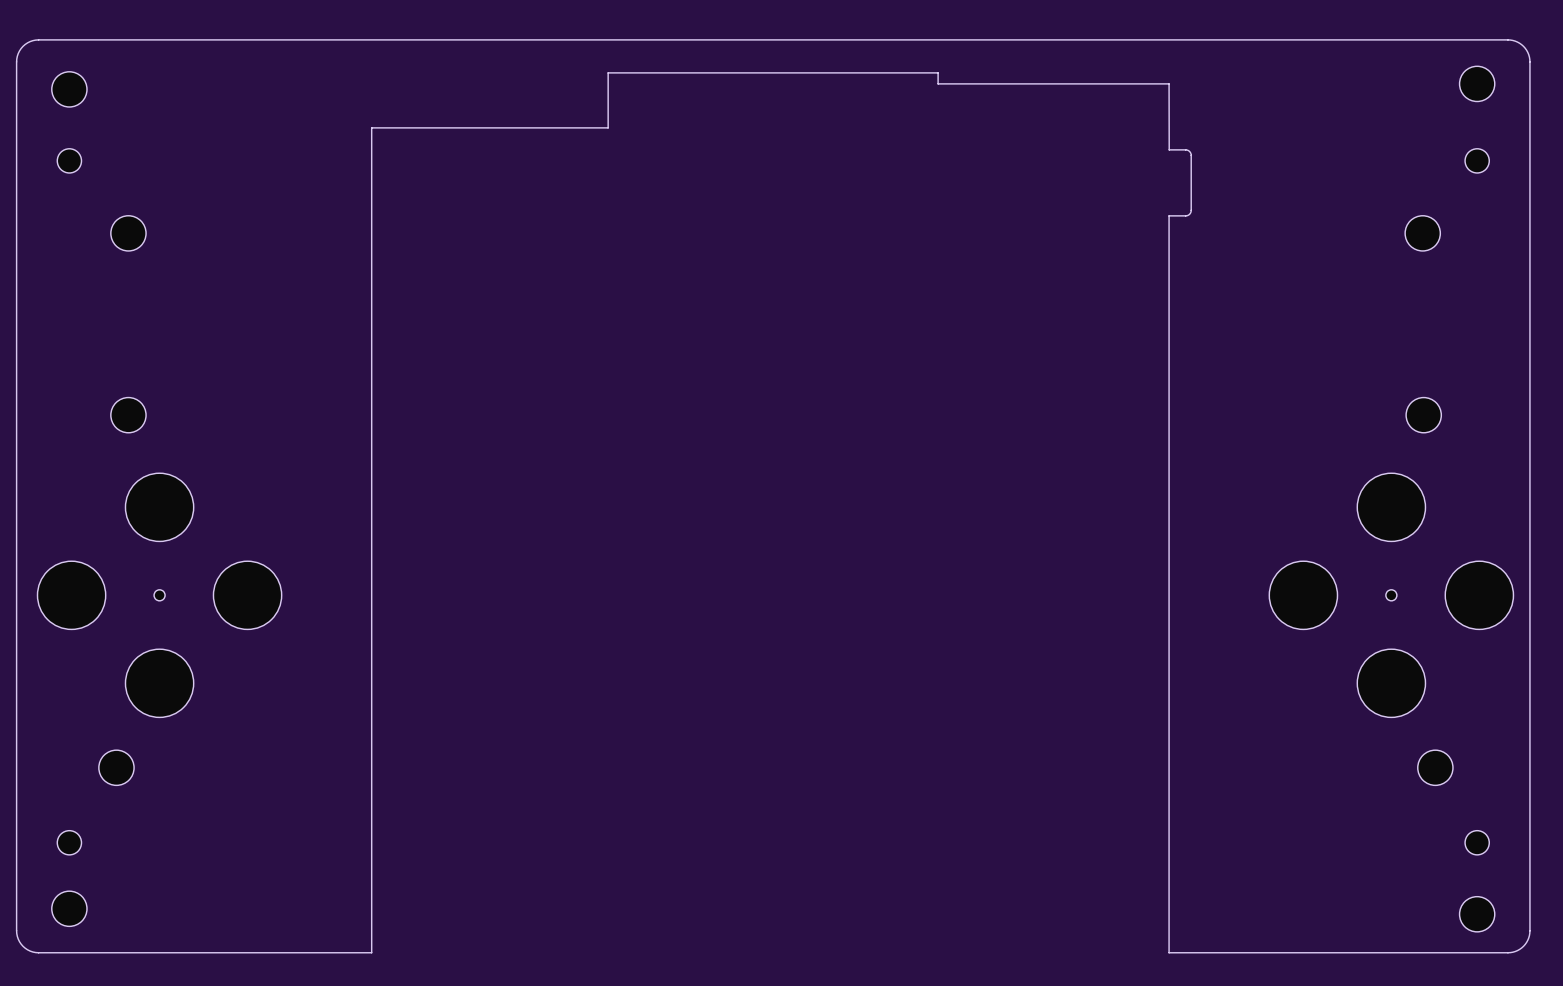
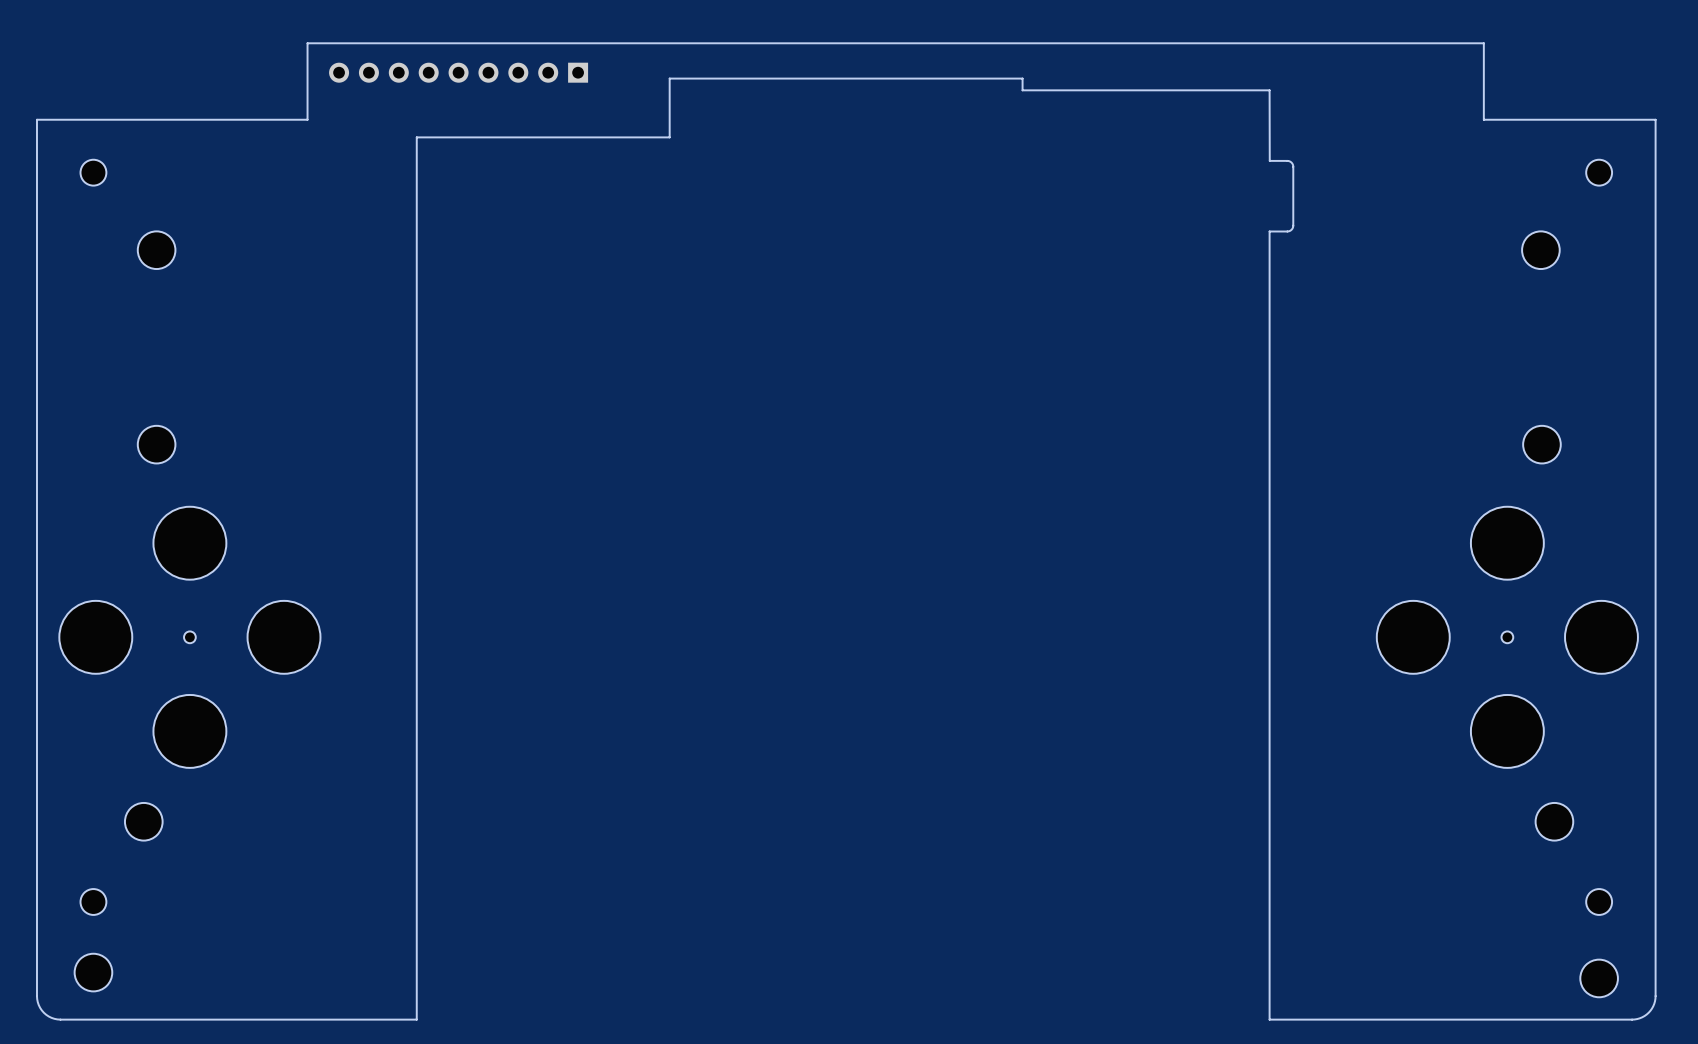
board edge: (269, 39) (32, 40) (23, 46) (17, 56) (16, 111) -> (307, 43) (307, 119) (36, 119)
board edge: (1369, 39) (1507, 39) (1517, 42) (1525, 48) (1529, 57) (1529, 111) -> (1483, 43) (1483, 119) (1655, 119)
part: none -> (458, 72)
part: (1477, 83) -> none
part: (69, 89) -> none

